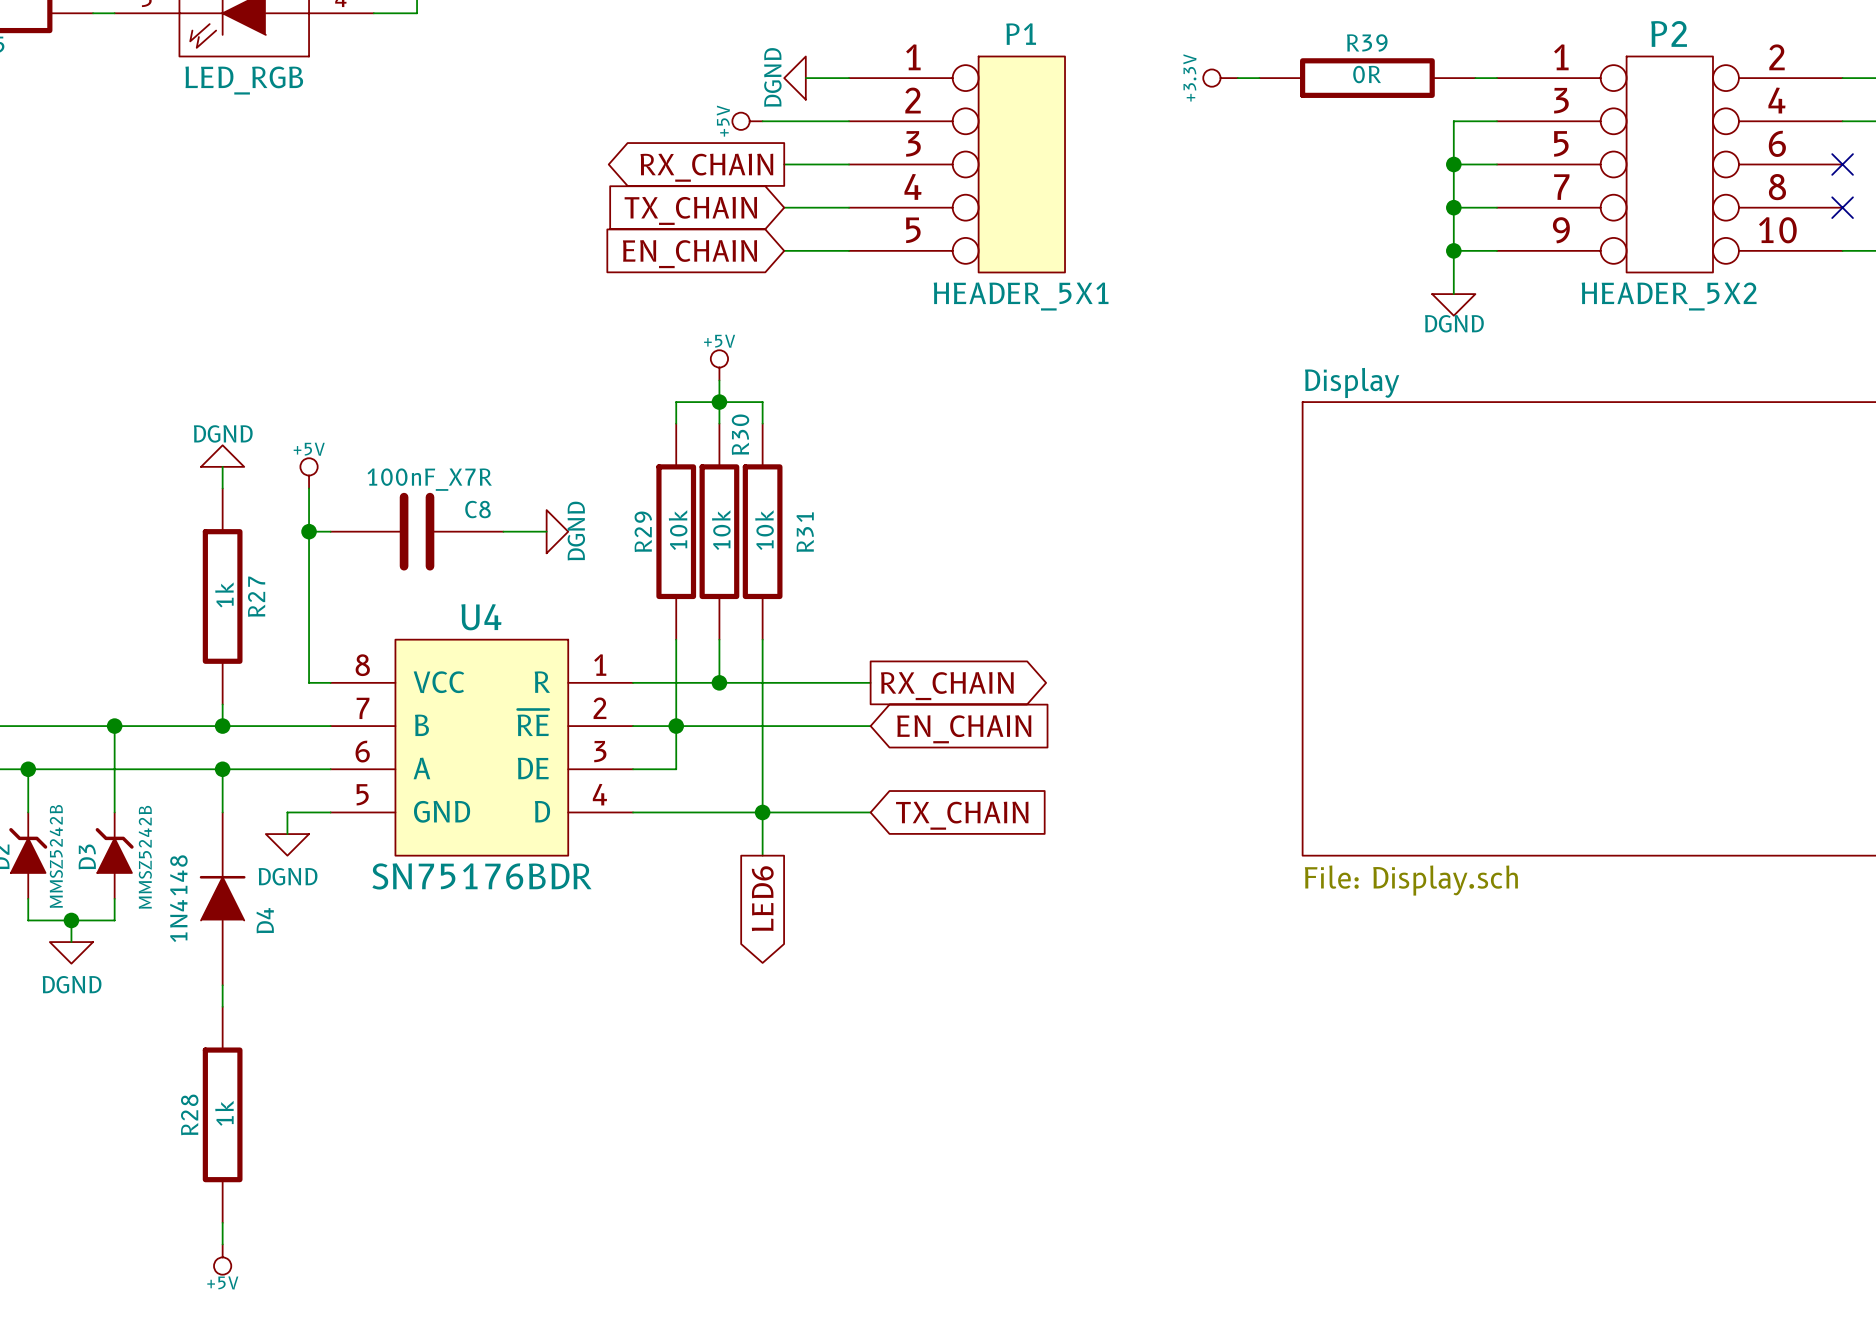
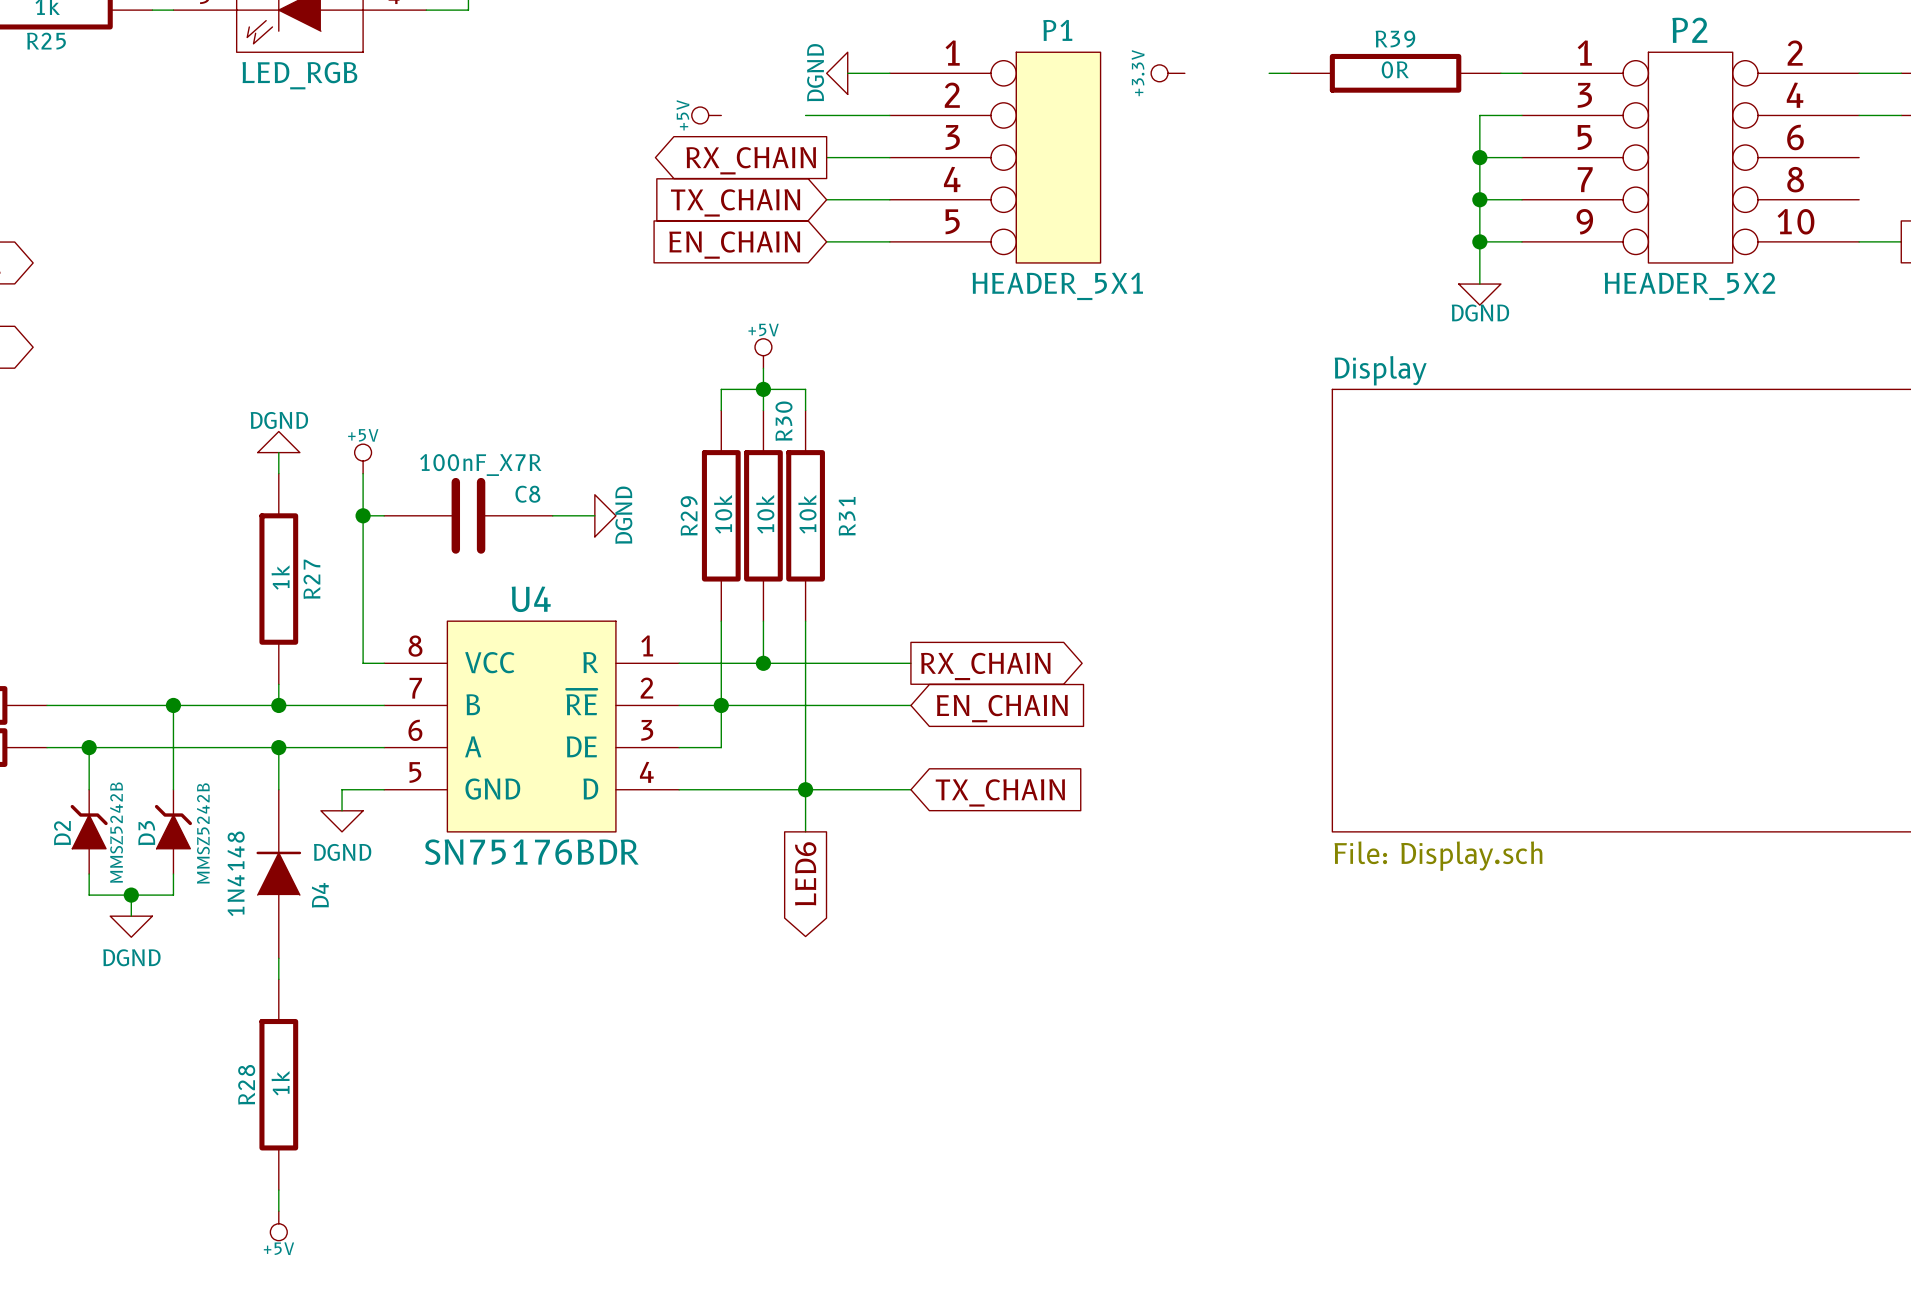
power symbol position: +3.3V (1220, 78) -> +3.3V (1168, 73)
power symbol position: +5V (747, 121) -> +5V (706, 115)
no-connect mark: (1842, 164) -> none
no-connect mark: (1842, 207) -> none

